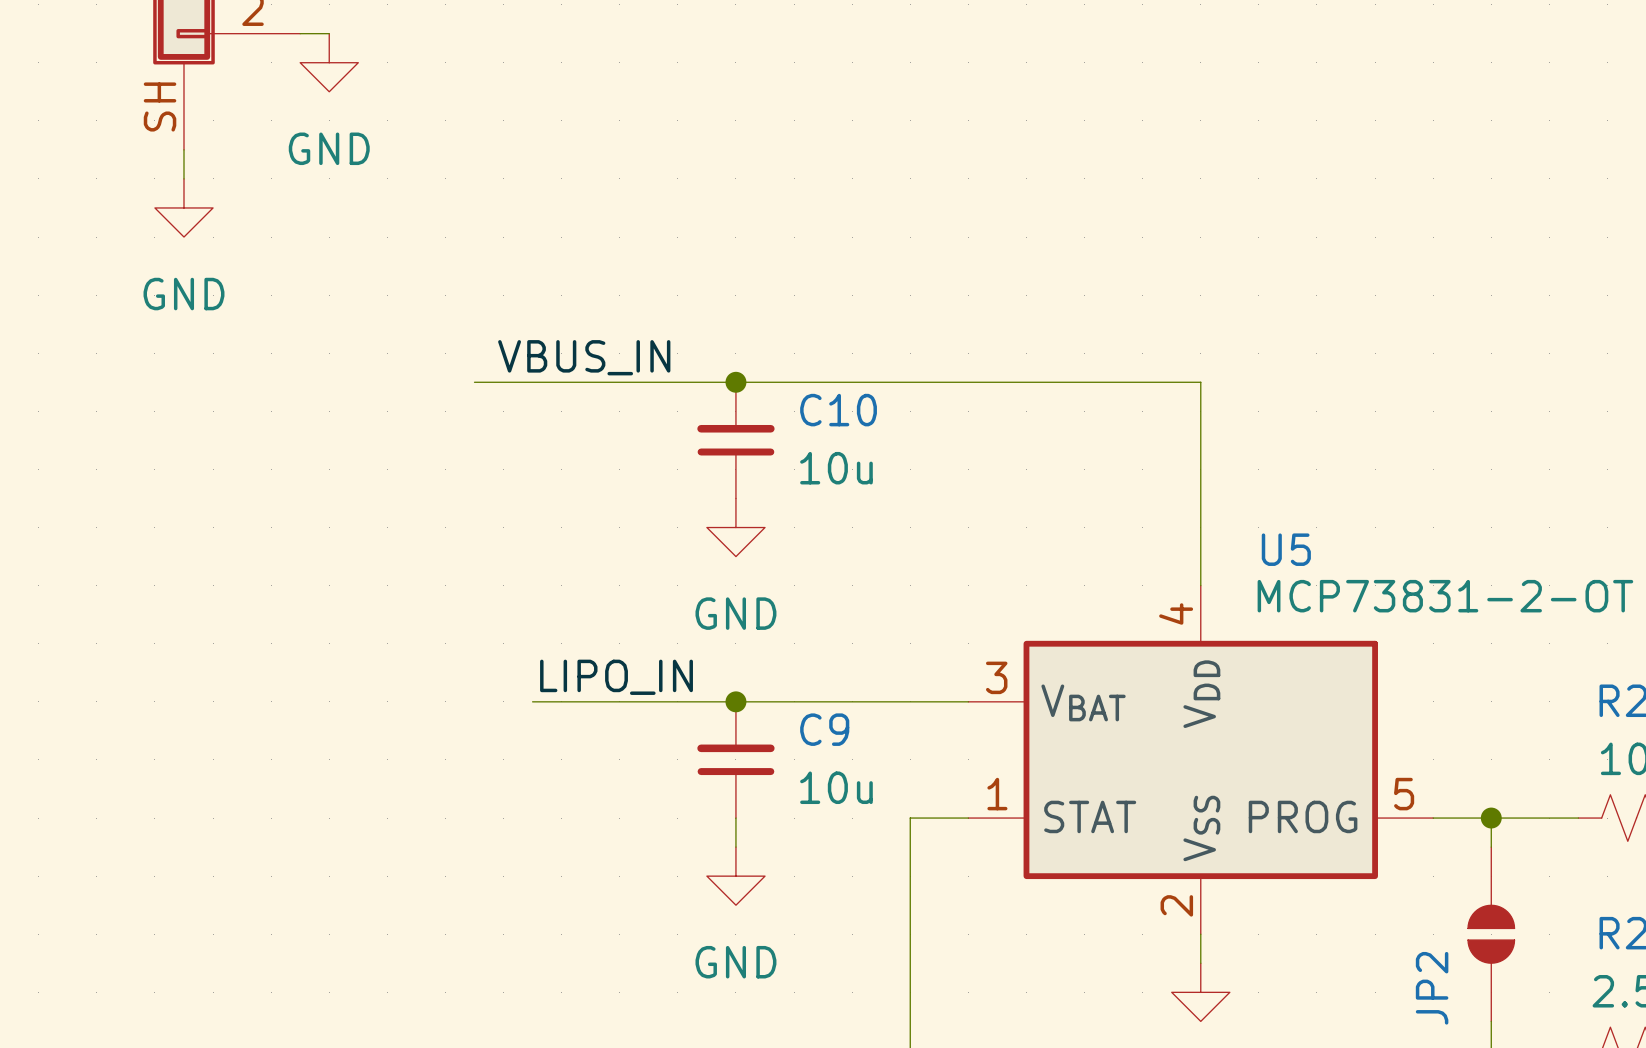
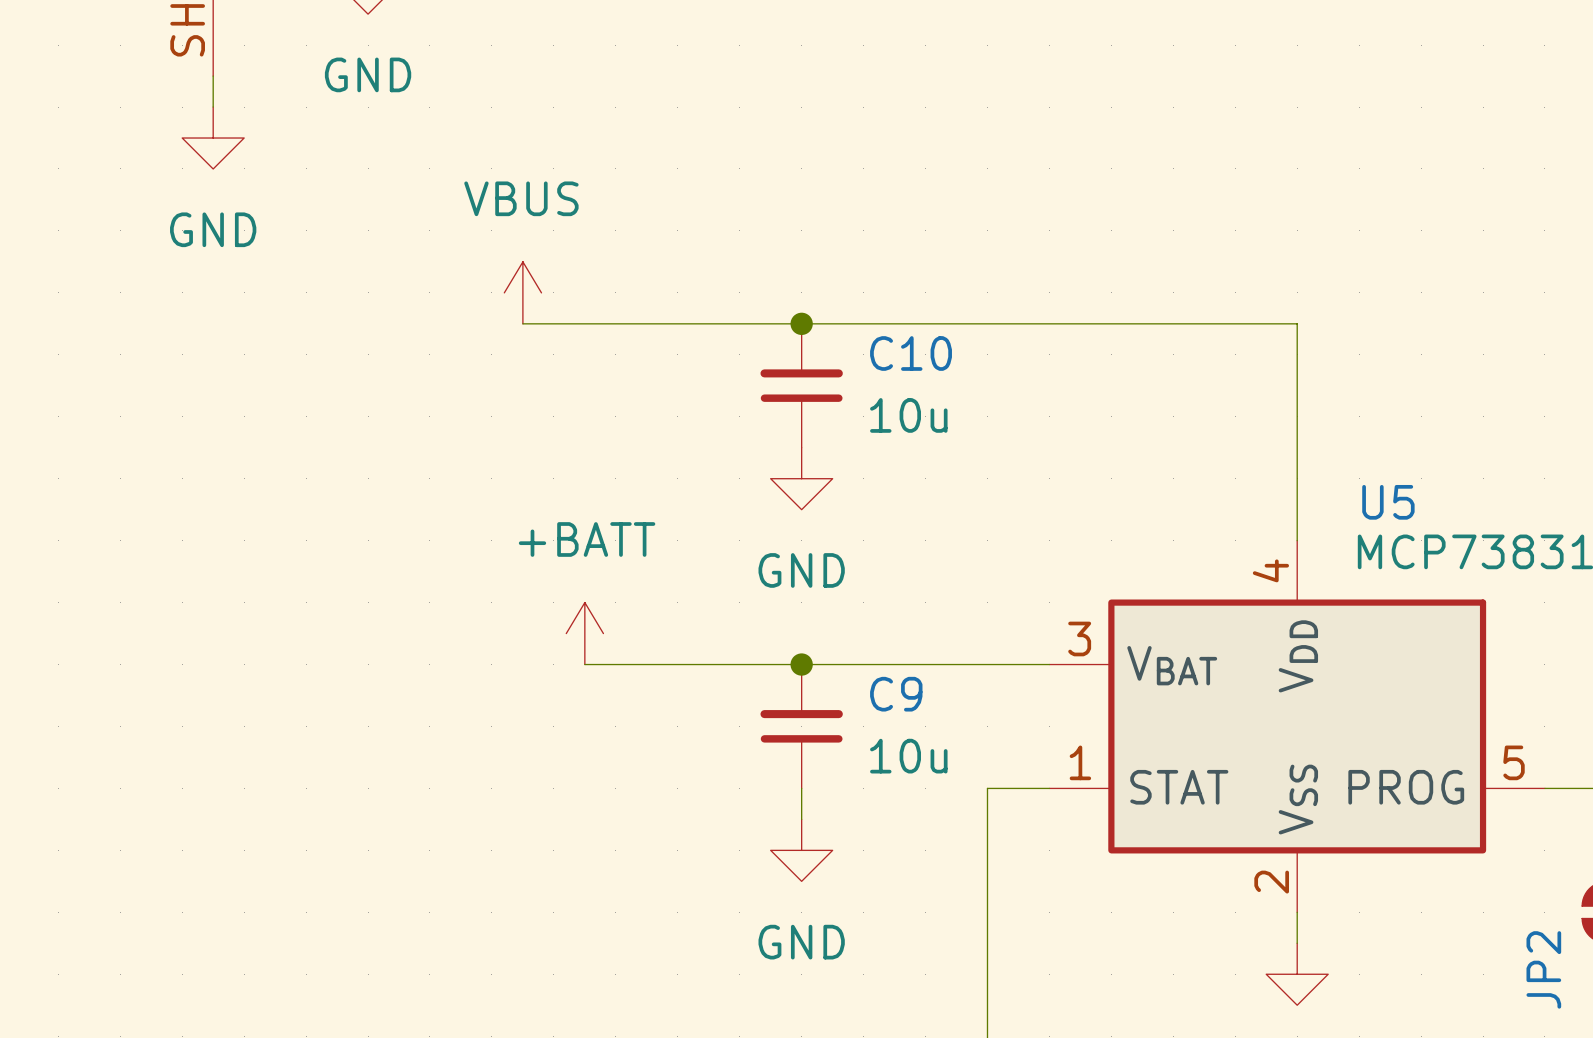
power symbol: none -> VBUS (522, 292)
label: VBUS_IN (584, 357) -> none
power symbol: none -> +BATT (584, 633)
label: LIPO_IN (616, 677) -> none

